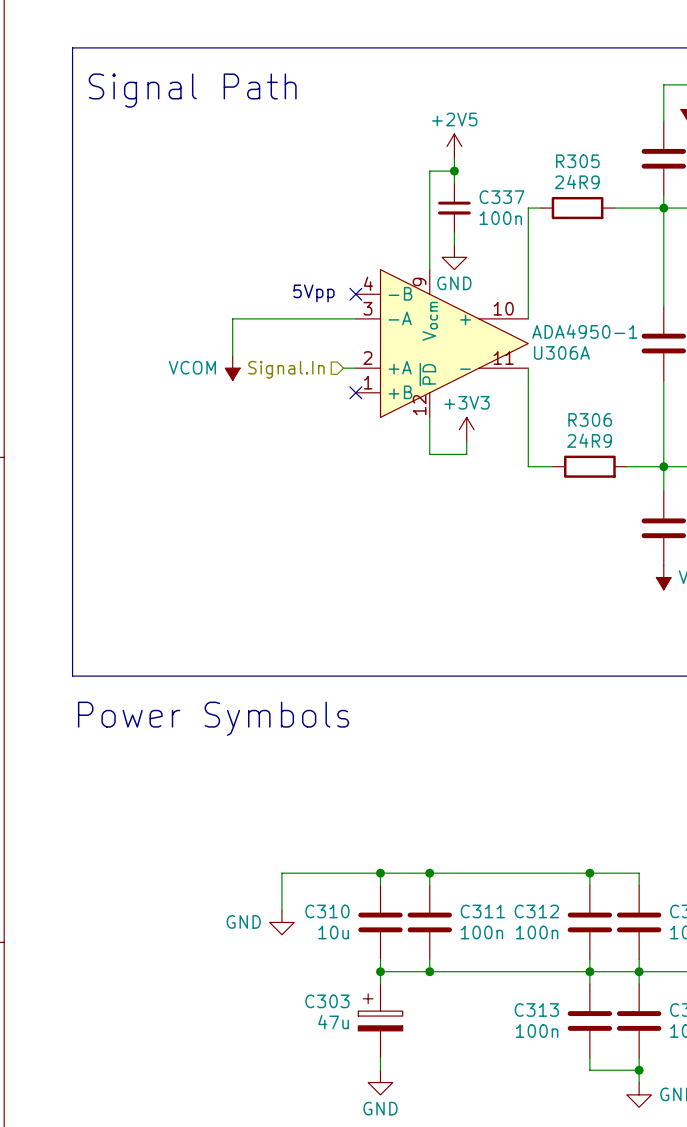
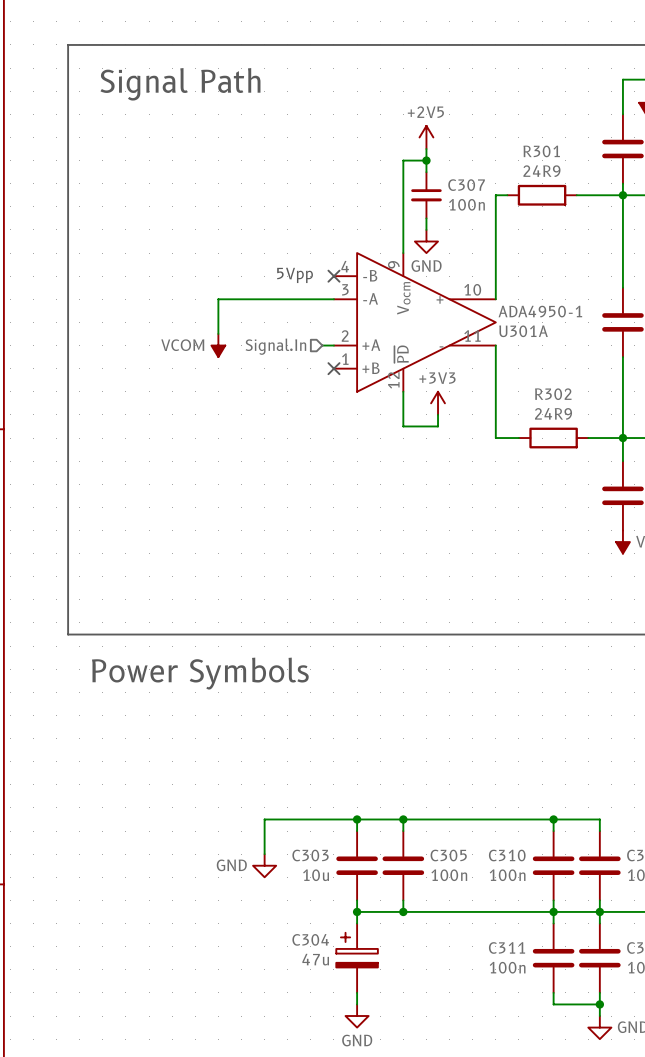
R305 name: R305 (577, 161) -> R301 (541, 151)
C337 name: C337 (501, 197) -> C307 (466, 185)
U306A name: U306A (561, 352) -> U301A (523, 331)
R306 name: R306 (590, 419) -> R302 (553, 394)
C310 name: C310 (327, 911) -> C303 (310, 855)
C311 name: C311 (482, 911) -> C305 (448, 855)
C312 name: C312 (536, 911) -> C310 (507, 855)
C303 name: C303 (327, 1001) -> C304 (310, 939)
C313 name: C313 (536, 1010) -> C311 (507, 947)

